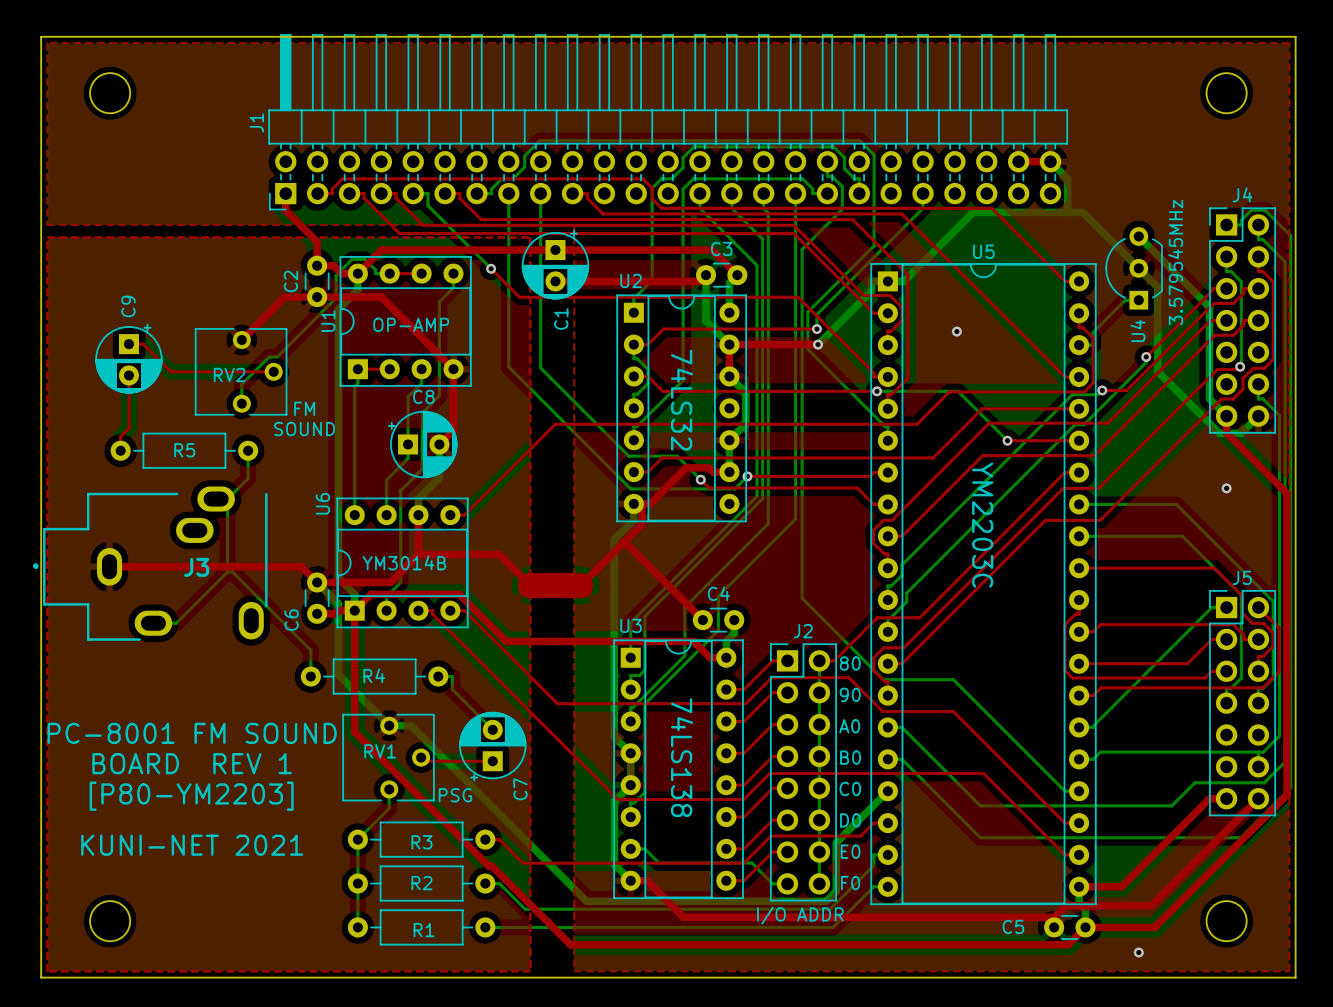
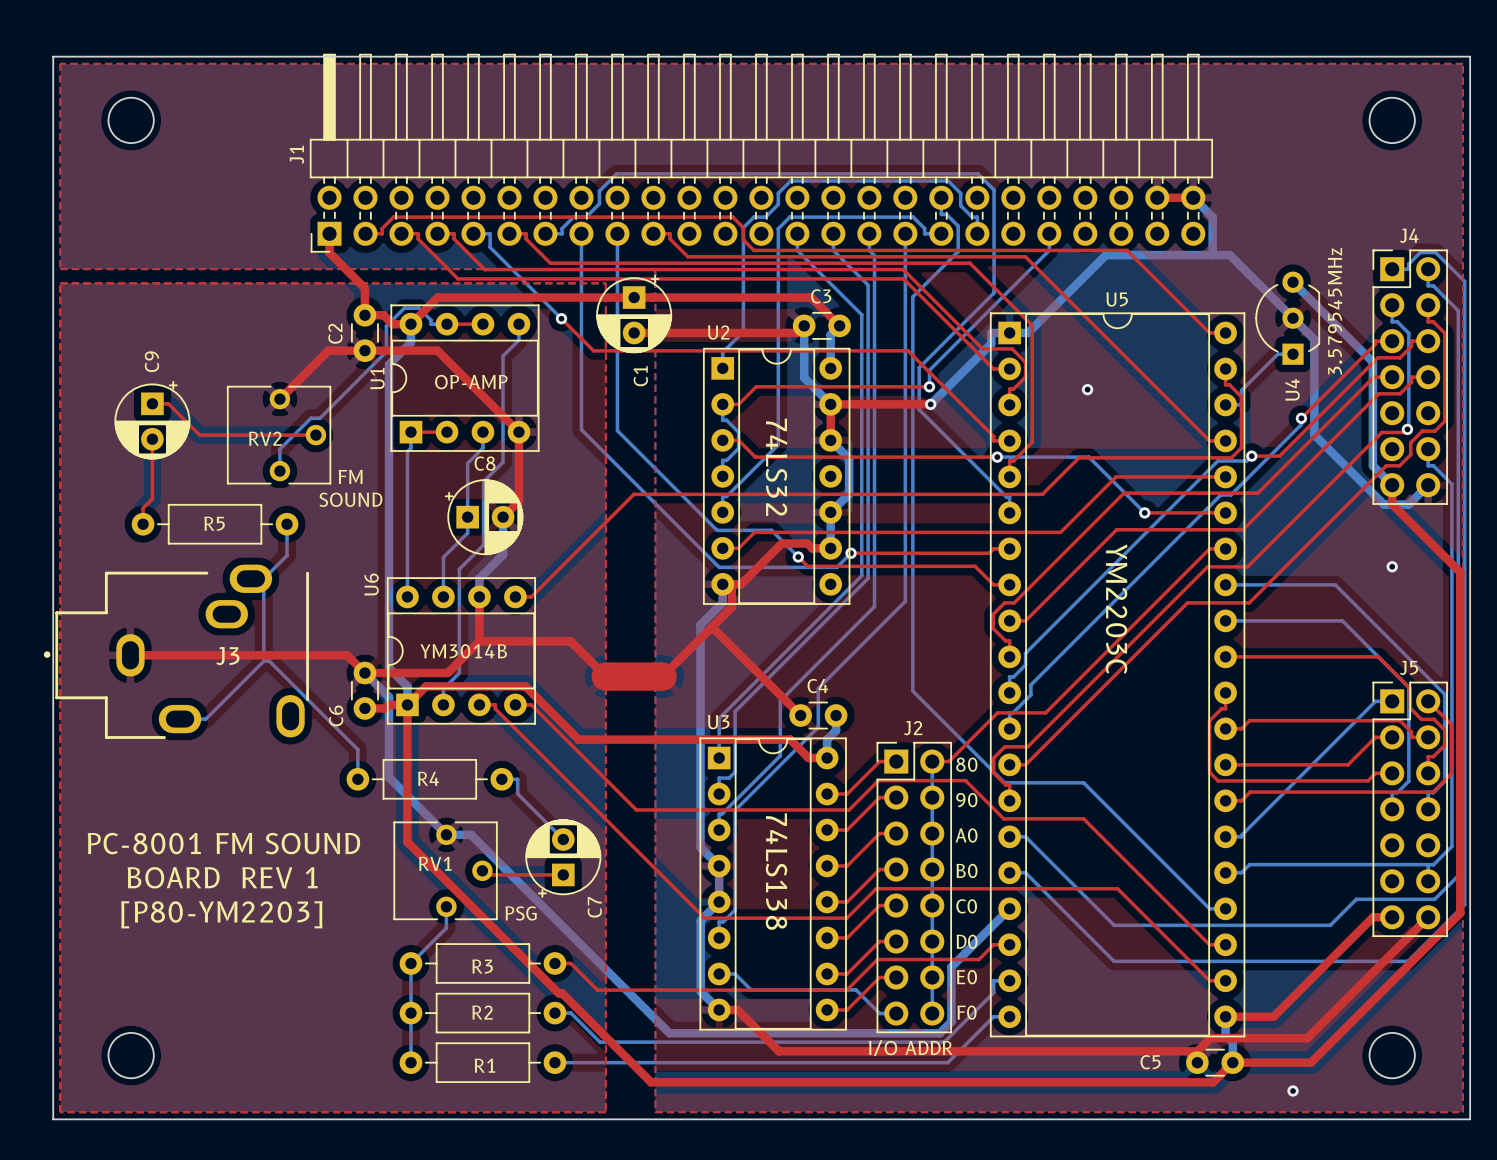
text: KUNI-NET 2021 (192, 845) -> none

